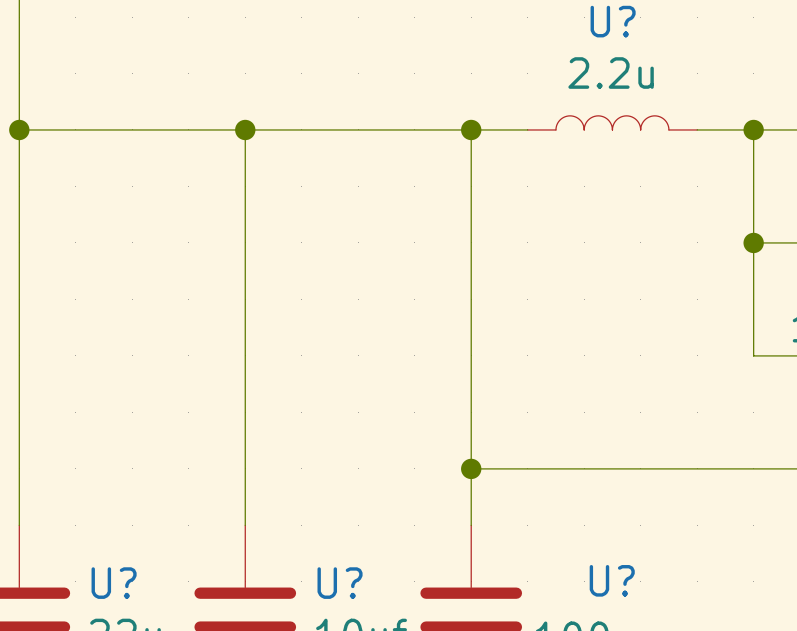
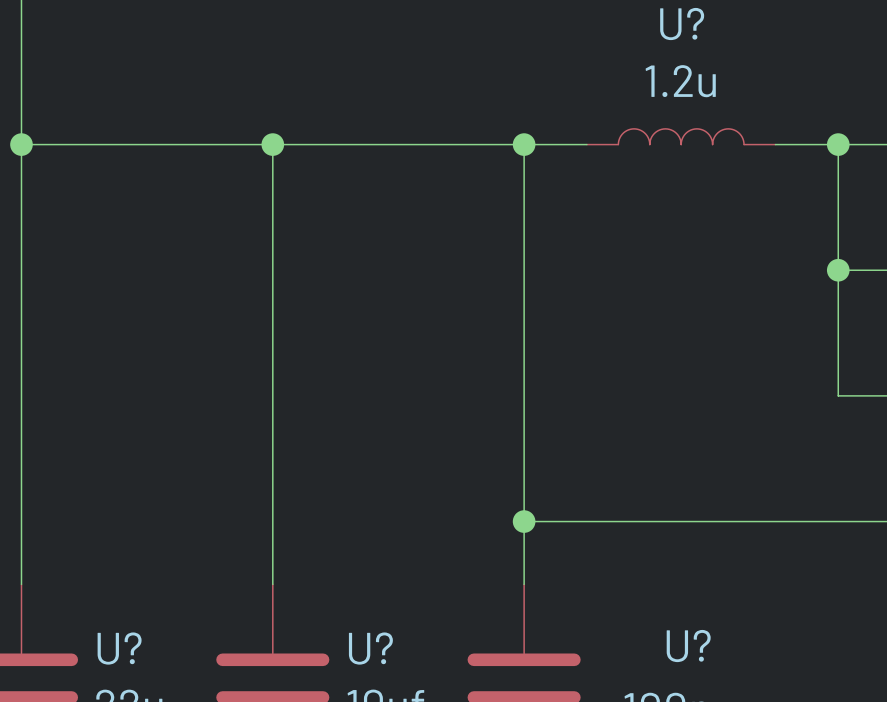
U? value: 2.2u (611, 73) -> 1.2u (680, 81)

